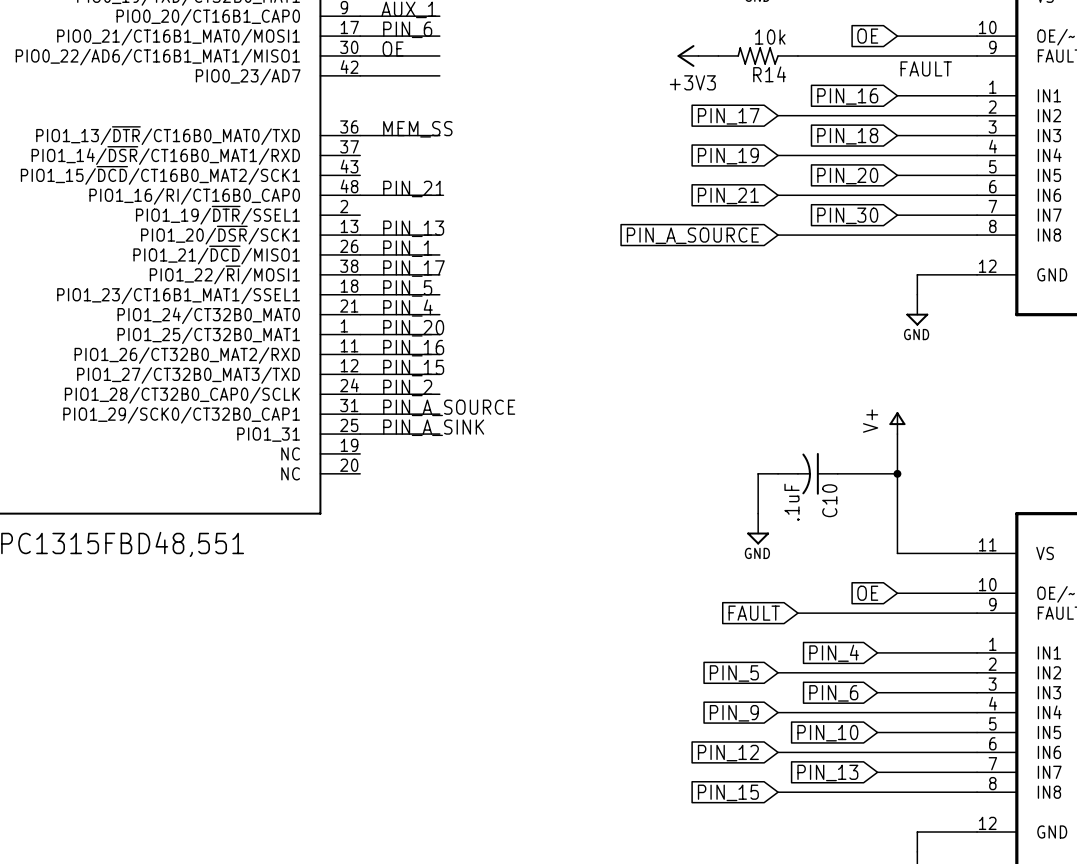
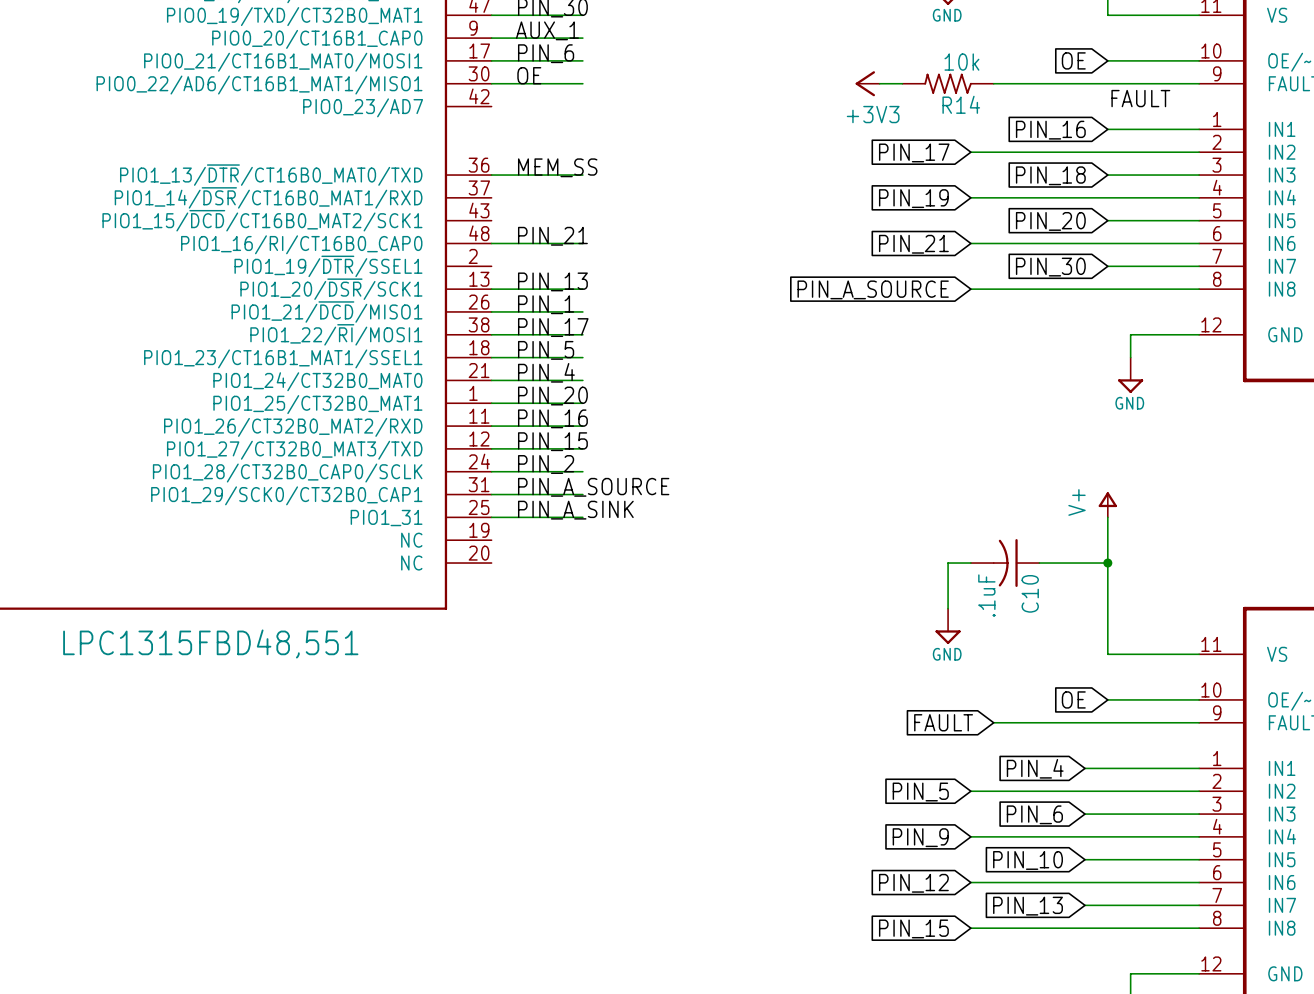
wire: (360, 75) (439, 75) -> none

